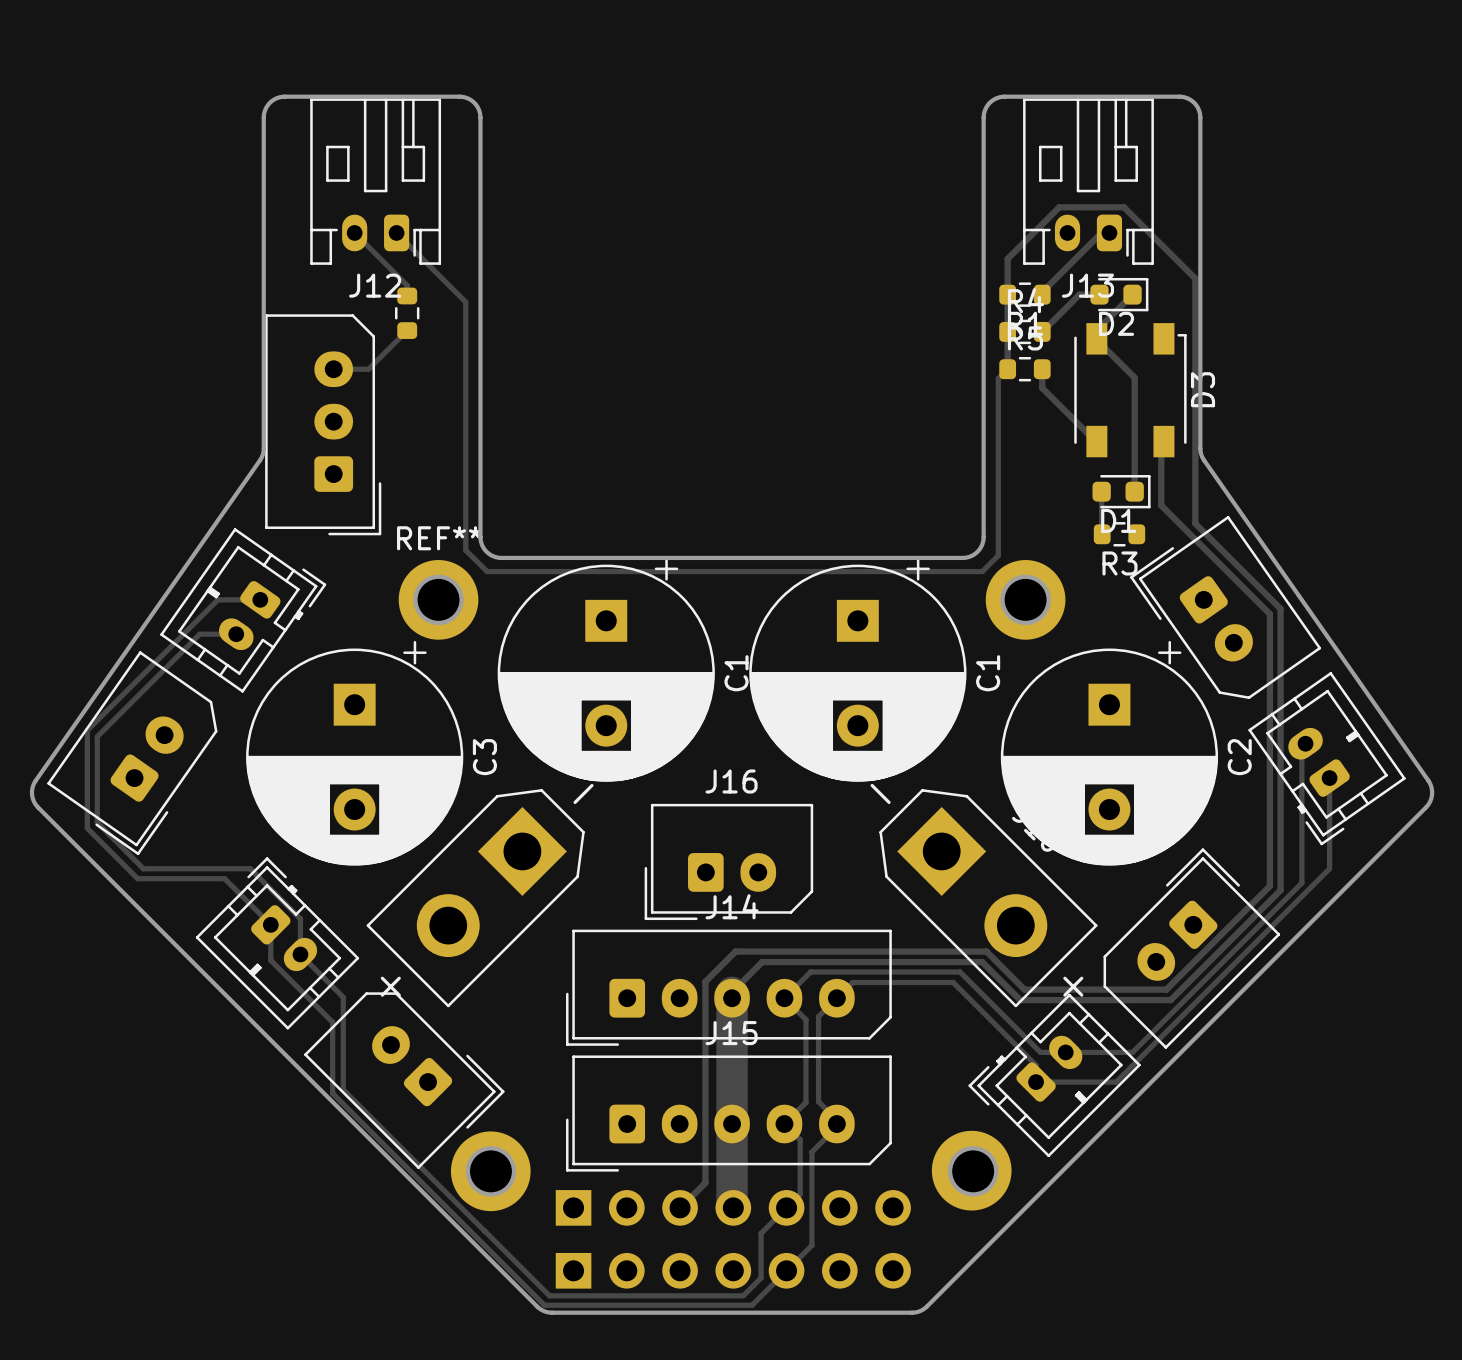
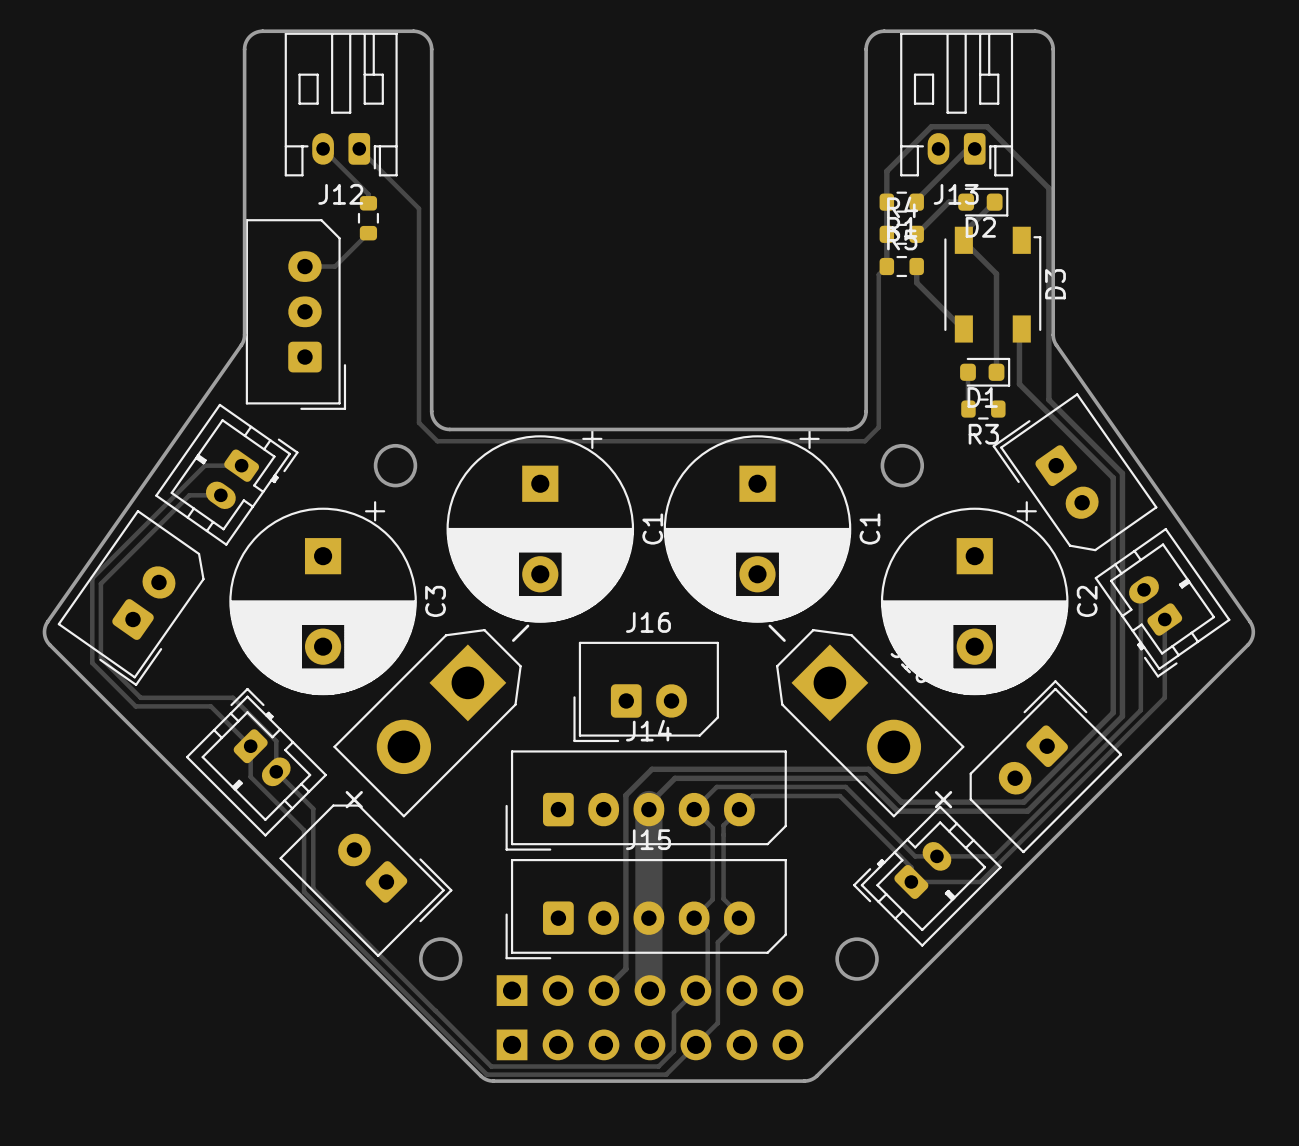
REF**: (438, 599) -> none
part: (1025, 599) -> none
part: (971, 1170) -> none
part: (490, 1171) -> none

